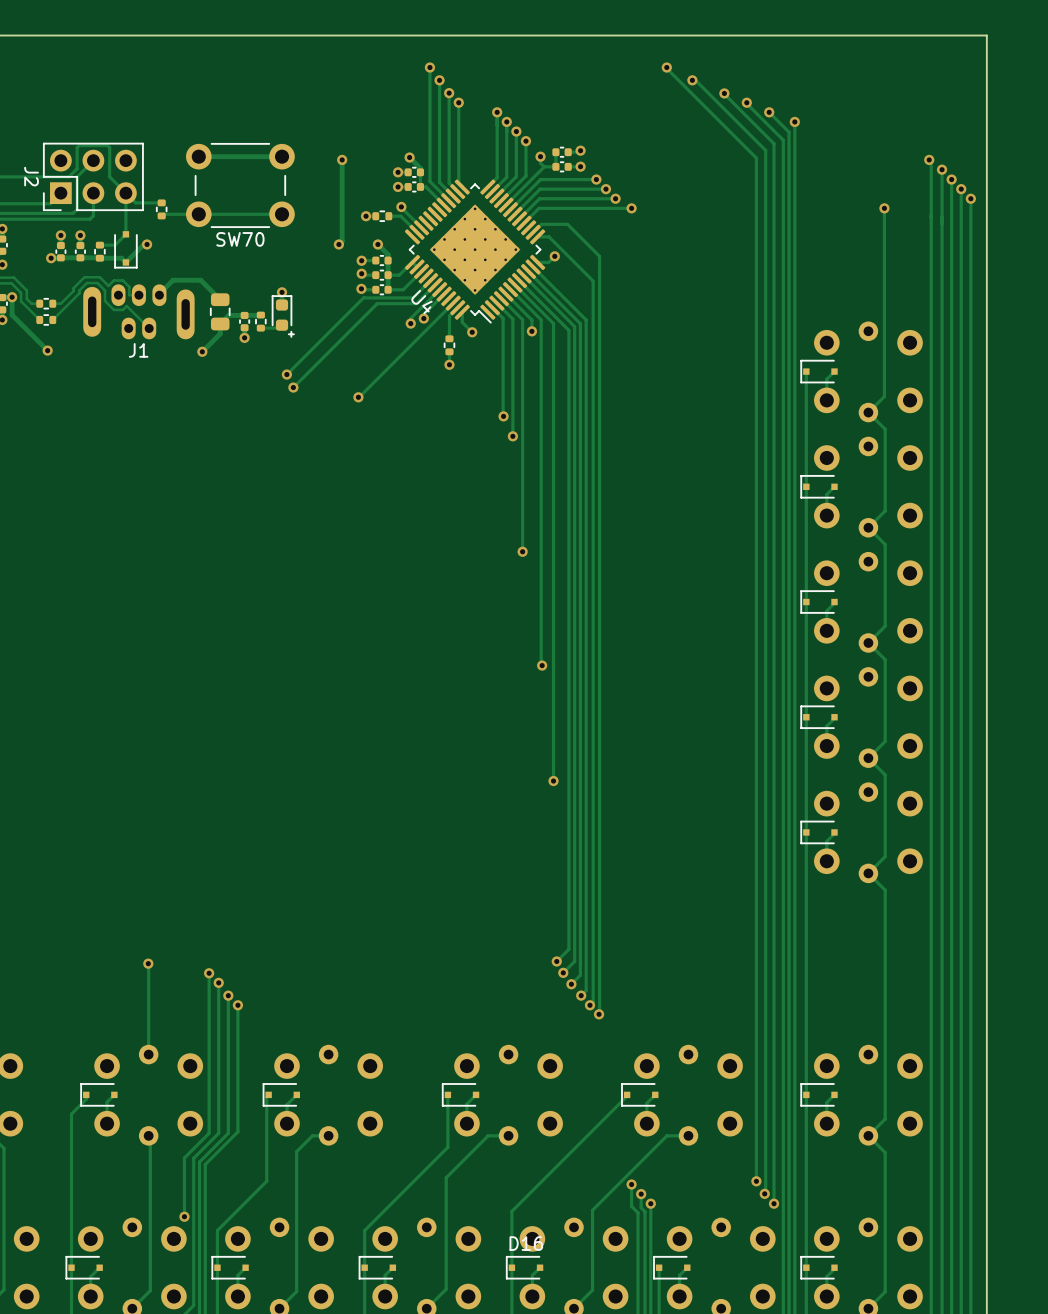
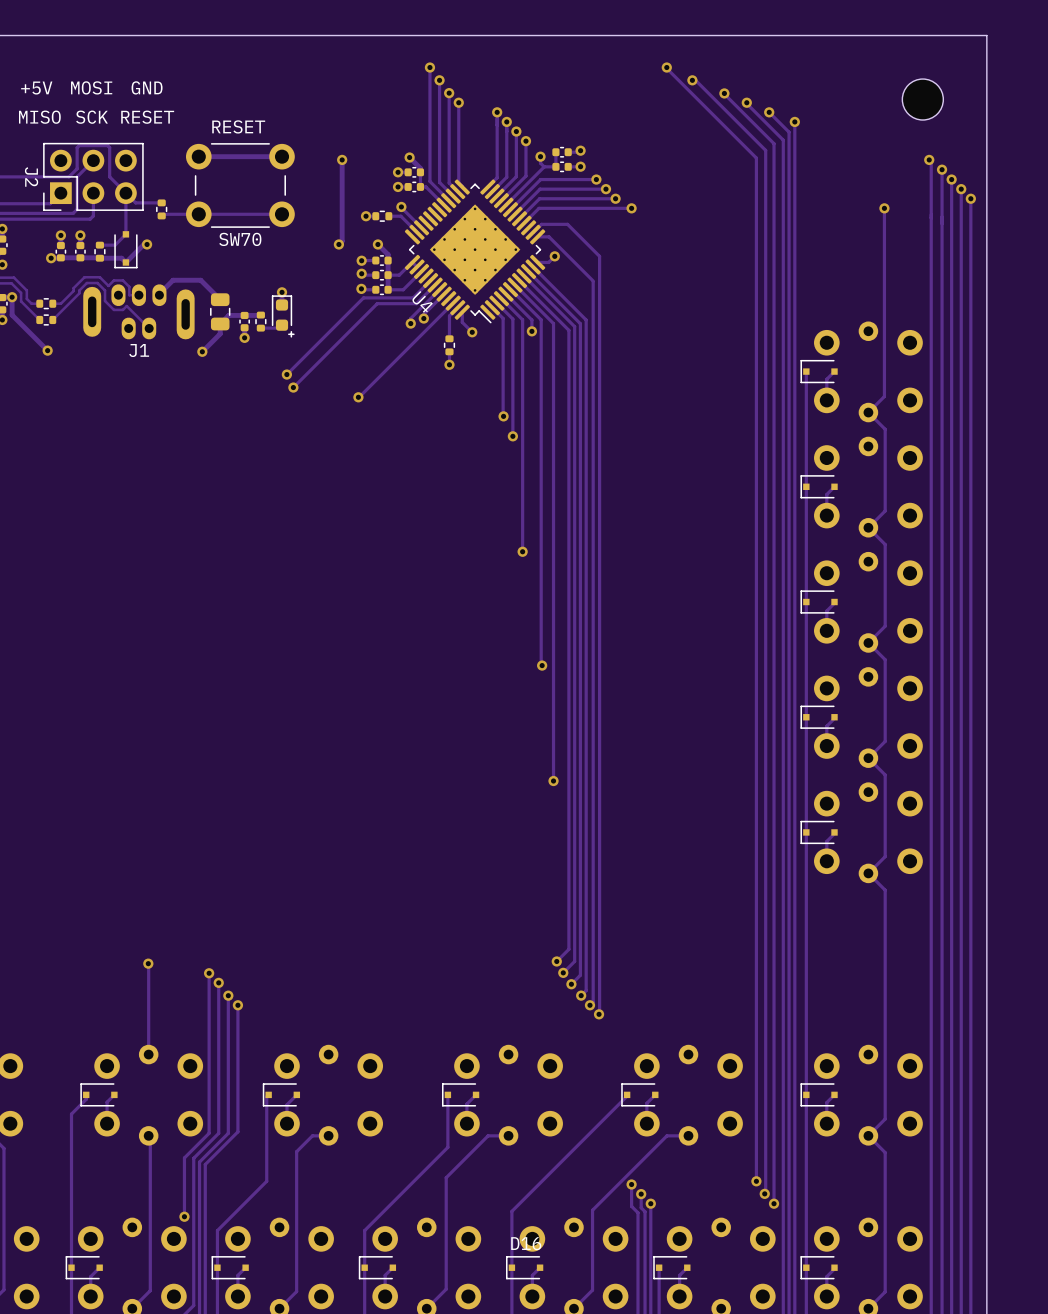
text: none -> +5V (36, 88)
text: none -> MOSI (91, 87)
text: none -> GND (147, 87)
part: none -> (922, 99)
text: none -> MISO (39, 117)
text: none -> SCK (91, 117)
text: none -> RESET (147, 117)
text: none -> RESET (238, 126)

